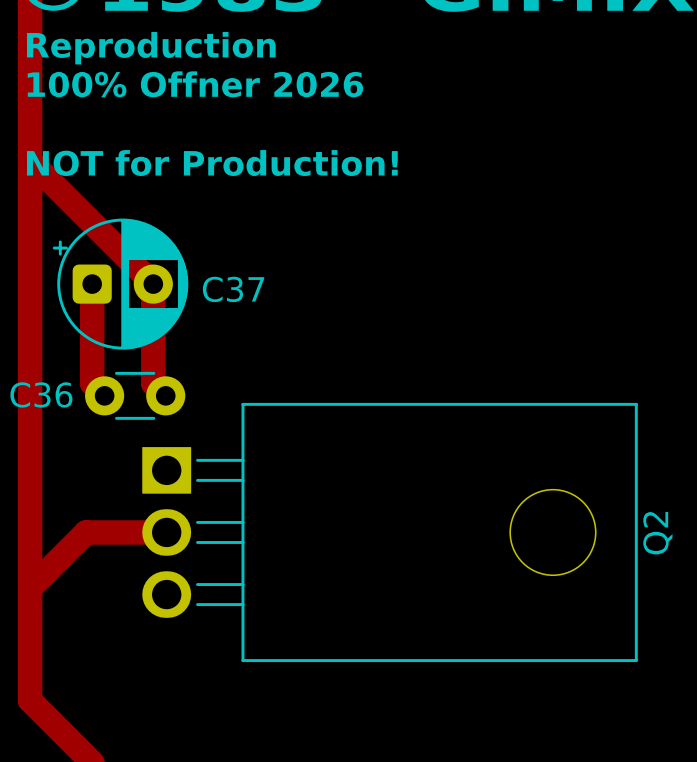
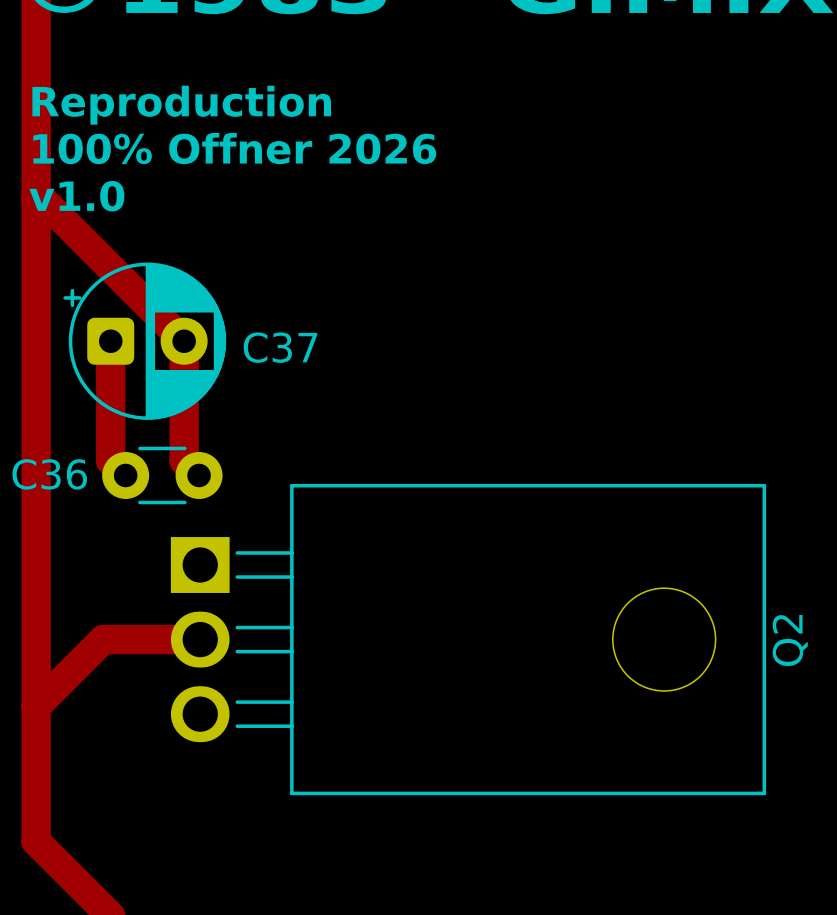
text: Reproduction (151, 48) -> none
text: 100% Offner 2026 (195, 84) -> Reproduction (181, 105)
text: none -> 100% Offner 2026 (234, 148)
text: NOT for Production! (212, 163) -> v1.0 (76, 196)

